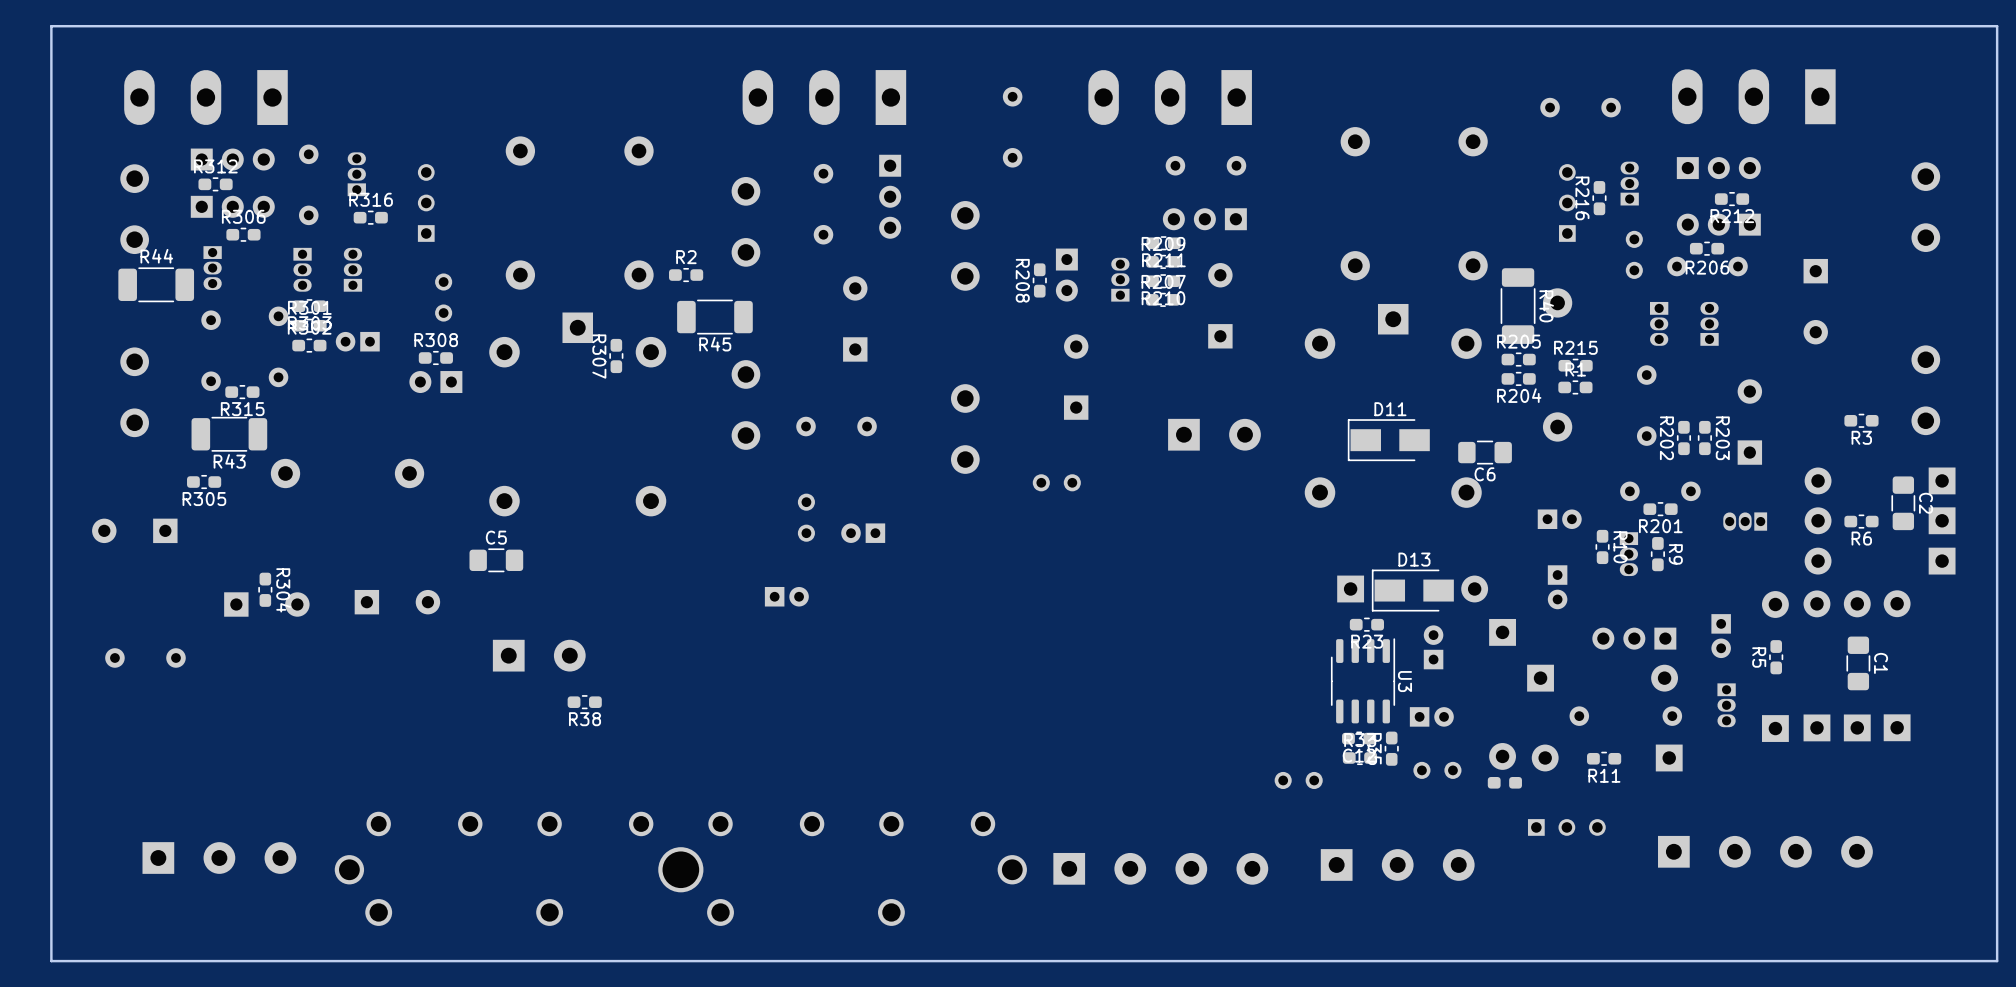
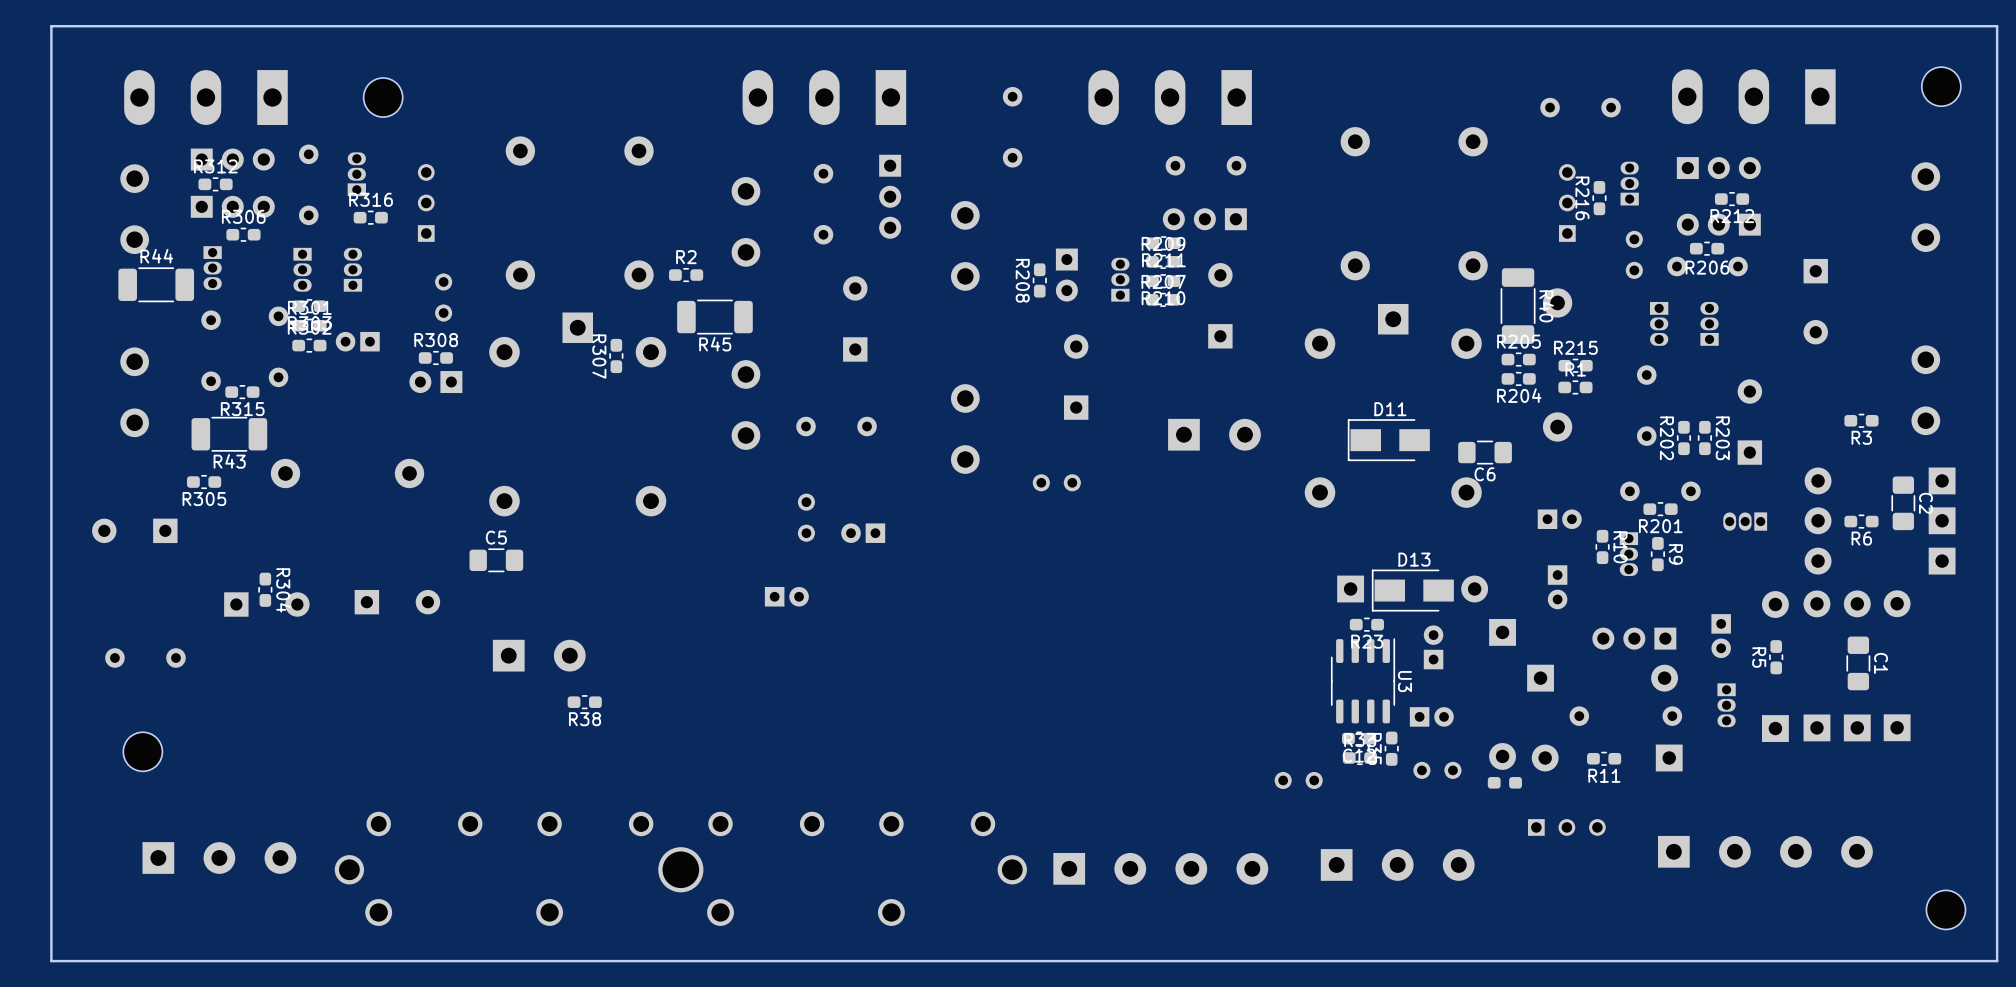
part: none -> (1941, 86)
part: none -> (383, 97)
part: none -> (142, 751)
part: none -> (1945, 909)

